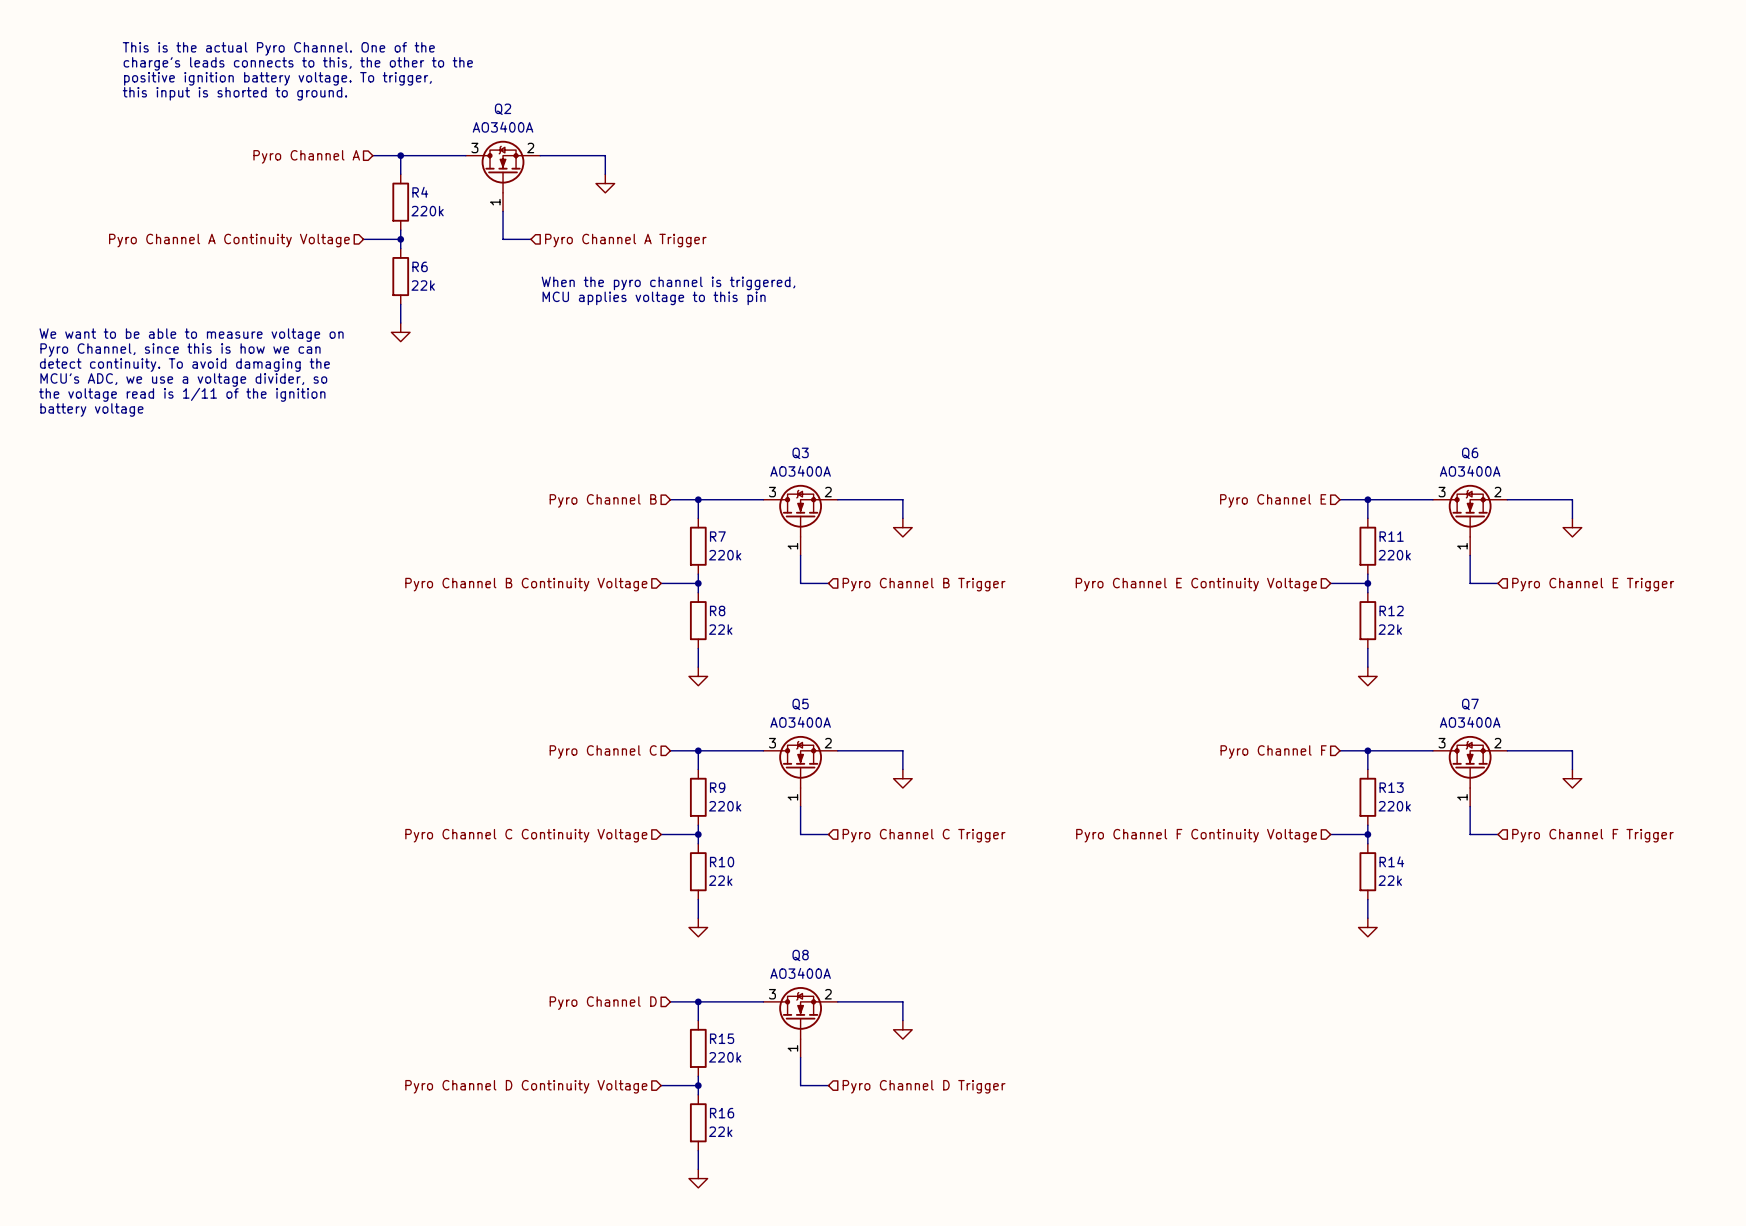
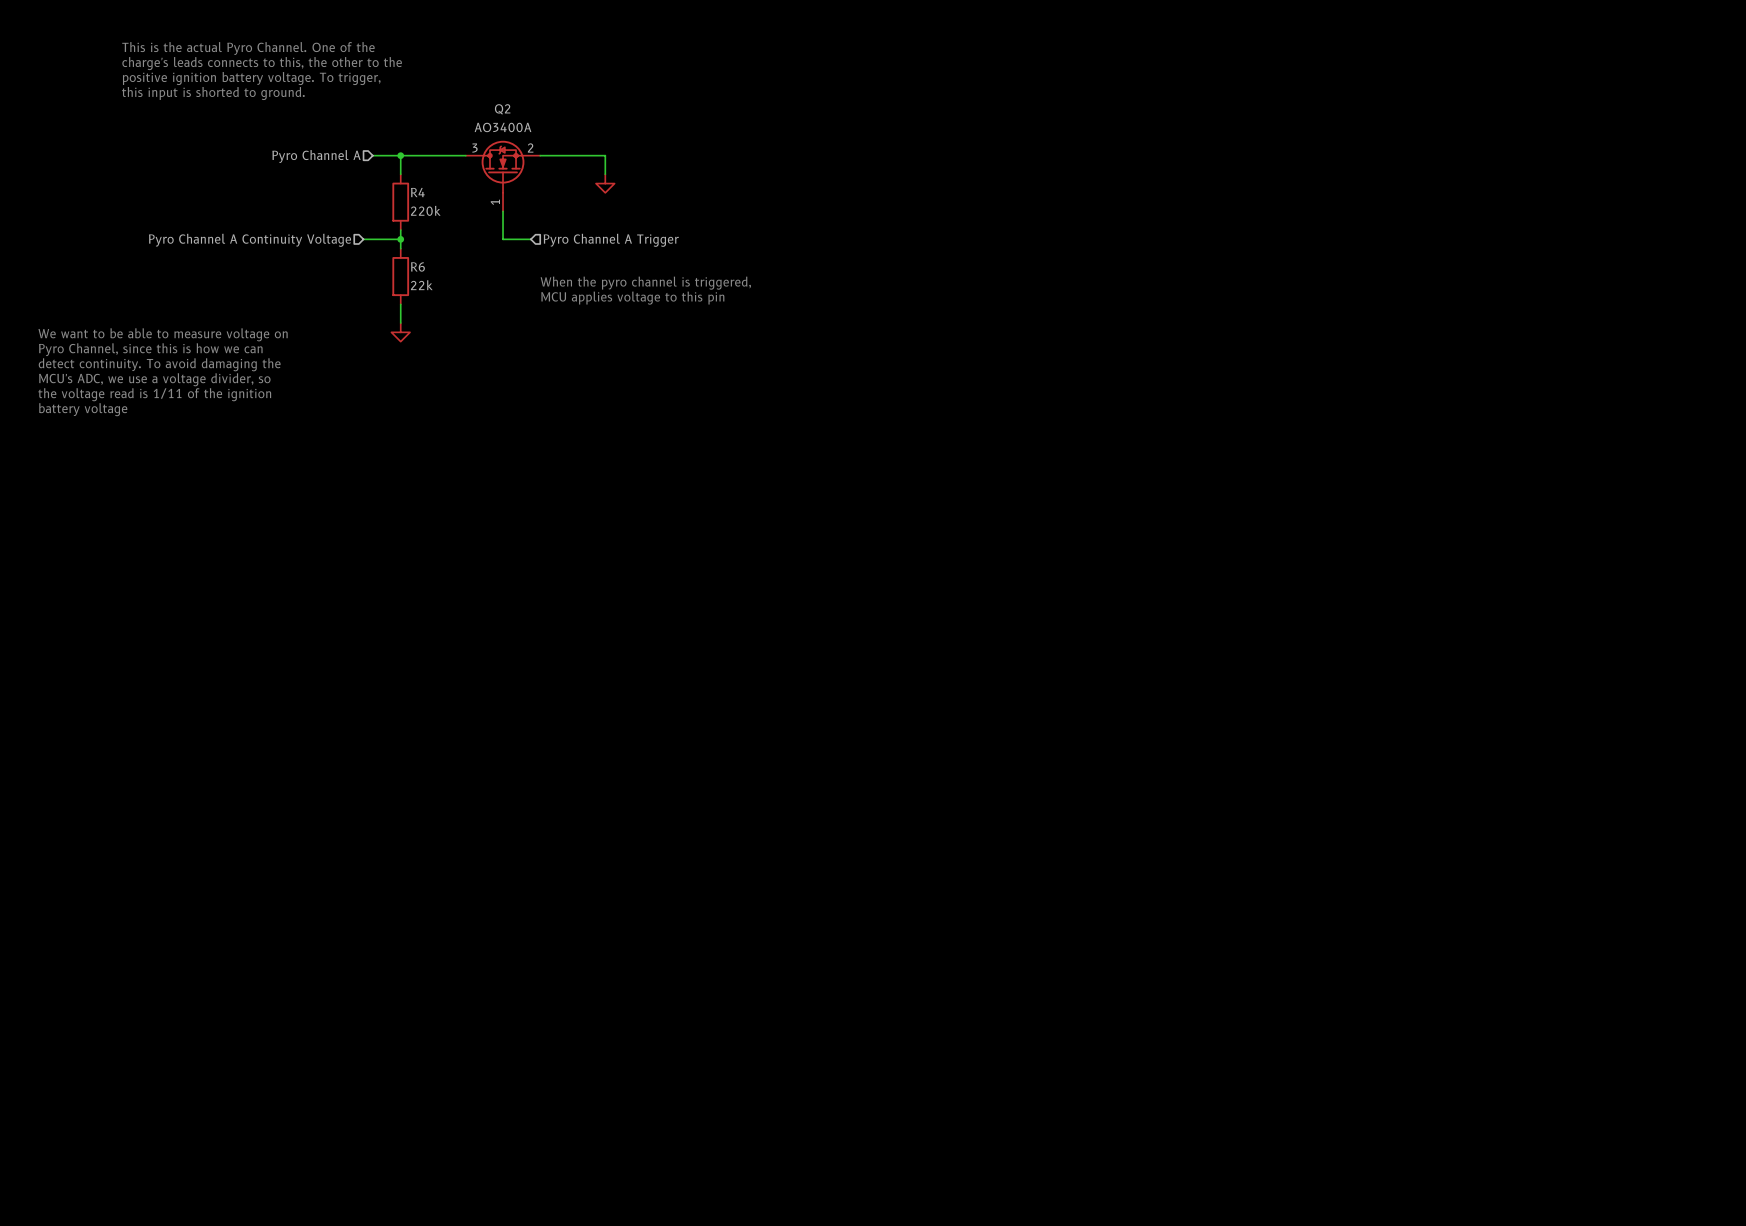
wire: (670, 499) (763, 499) -> none
wire: (698, 499) (698, 518) -> none
junction: (698, 499) -> none
wire: (837, 499) (902, 499) (902, 518) -> none
wire: (1339, 499) (1432, 499) -> none
wire: (1367, 499) (1367, 518) -> none
junction: (1367, 499) -> none
wire: (1507, 499) (1572, 499) (1572, 518) -> none
hierarchical label: Pyro Channel B (603, 500) -> none
hierarchical label: Pyro Channel E (1273, 500) -> none
Q3: AO3400A (800, 520) -> none
Q6: AO3400A (1470, 520) -> none
power symbol: (902, 527) -> none
power symbol: (1572, 527) -> none
R7: 220k (698, 546) -> none
R11: 220k (1367, 546) -> none
wire: (800, 555) (800, 583) (828, 583) -> none
wire: (1470, 555) (1470, 583) (1498, 583) -> none
wire: (698, 574) (698, 592) -> none
wire: (1367, 574) (1367, 592) -> none
wire: (661, 583) (698, 583) -> none
junction: (698, 583) -> none
wire: (1330, 583) (1367, 583) -> none
junction: (1367, 583) -> none
hierarchical label: Pyro Channel B Continuity Voltage (526, 584) -> none
hierarchical label: Pyro Channel B Trigger (924, 584) -> none
hierarchical label: Pyro Channel E Continuity Voltage (1196, 584) -> none
hierarchical label: Pyro Channel E Trigger (1593, 584) -> none
R8: 22k (698, 620) -> none
R12: 22k (1367, 620) -> none
wire: (698, 648) (698, 667) -> none
wire: (1367, 648) (1367, 667) -> none
power symbol: (698, 676) -> none
power symbol: (1367, 676) -> none
wire: (670, 750) (763, 750) -> none
wire: (698, 750) (698, 769) -> none
junction: (698, 750) -> none
wire: (837, 750) (902, 750) (902, 769) -> none
wire: (1339, 750) (1432, 750) -> none
wire: (1367, 750) (1367, 769) -> none
junction: (1367, 750) -> none
wire: (1507, 750) (1572, 750) (1572, 769) -> none
hierarchical label: Pyro Channel C (603, 752) -> none
hierarchical label: Pyro Channel F (1273, 752) -> none
Q5: AO3400A (800, 771) -> none
Q7: AO3400A (1470, 771) -> none
power symbol: (902, 778) -> none
power symbol: (1572, 778) -> none
R9: 220k (698, 797) -> none
R13: 220k (1367, 797) -> none
wire: (800, 806) (800, 834) (828, 834) -> none
wire: (1470, 806) (1470, 834) (1498, 834) -> none
wire: (698, 825) (698, 843) -> none
wire: (1367, 825) (1367, 843) -> none
wire: (661, 834) (698, 834) -> none
junction: (698, 834) -> none
wire: (1330, 834) (1367, 834) -> none
junction: (1367, 834) -> none
hierarchical label: Pyro Channel C Continuity Voltage (526, 835) -> none
hierarchical label: Pyro Channel C Trigger (924, 835) -> none
hierarchical label: Pyro Channel F Continuity Voltage (1196, 835) -> none
hierarchical label: Pyro Channel F Trigger (1592, 835) -> none
R10: 22k (698, 871) -> none
R14: 22k (1367, 871) -> none
wire: (698, 899) (698, 918) -> none
wire: (1367, 899) (1367, 918) -> none
power symbol: (698, 927) -> none
power symbol: (1367, 927) -> none
wire: (670, 1001) (763, 1001) -> none
wire: (698, 1001) (698, 1020) -> none
junction: (698, 1001) -> none
wire: (837, 1001) (902, 1001) (902, 1020) -> none
hierarchical label: Pyro Channel D (603, 1003) -> none
Q8: AO3400A (800, 1022) -> none
power symbol: (902, 1029) -> none
R15: 220k (698, 1048) -> none
wire: (800, 1057) (800, 1085) (828, 1085) -> none
wire: (698, 1076) (698, 1094) -> none
wire: (661, 1085) (698, 1085) -> none
junction: (698, 1085) -> none
hierarchical label: Pyro Channel D Continuity Voltage (526, 1086) -> none
hierarchical label: Pyro Channel D Trigger (924, 1086) -> none
R16: 22k (698, 1122) -> none
wire: (698, 1150) (698, 1169) -> none
power symbol: (698, 1178) -> none

